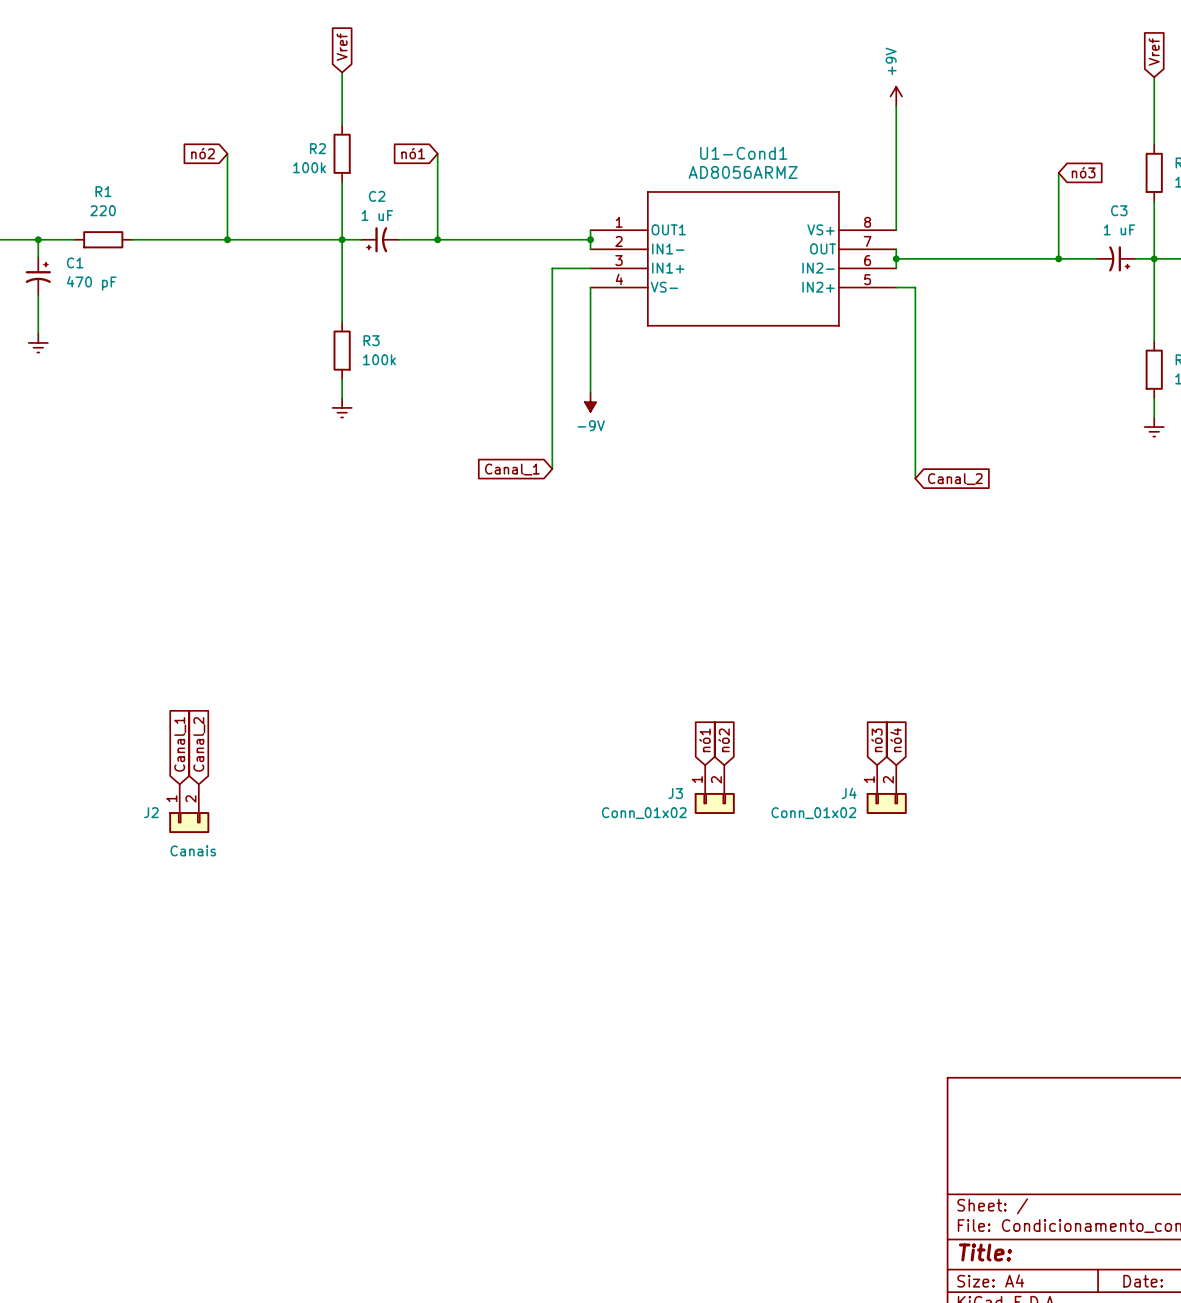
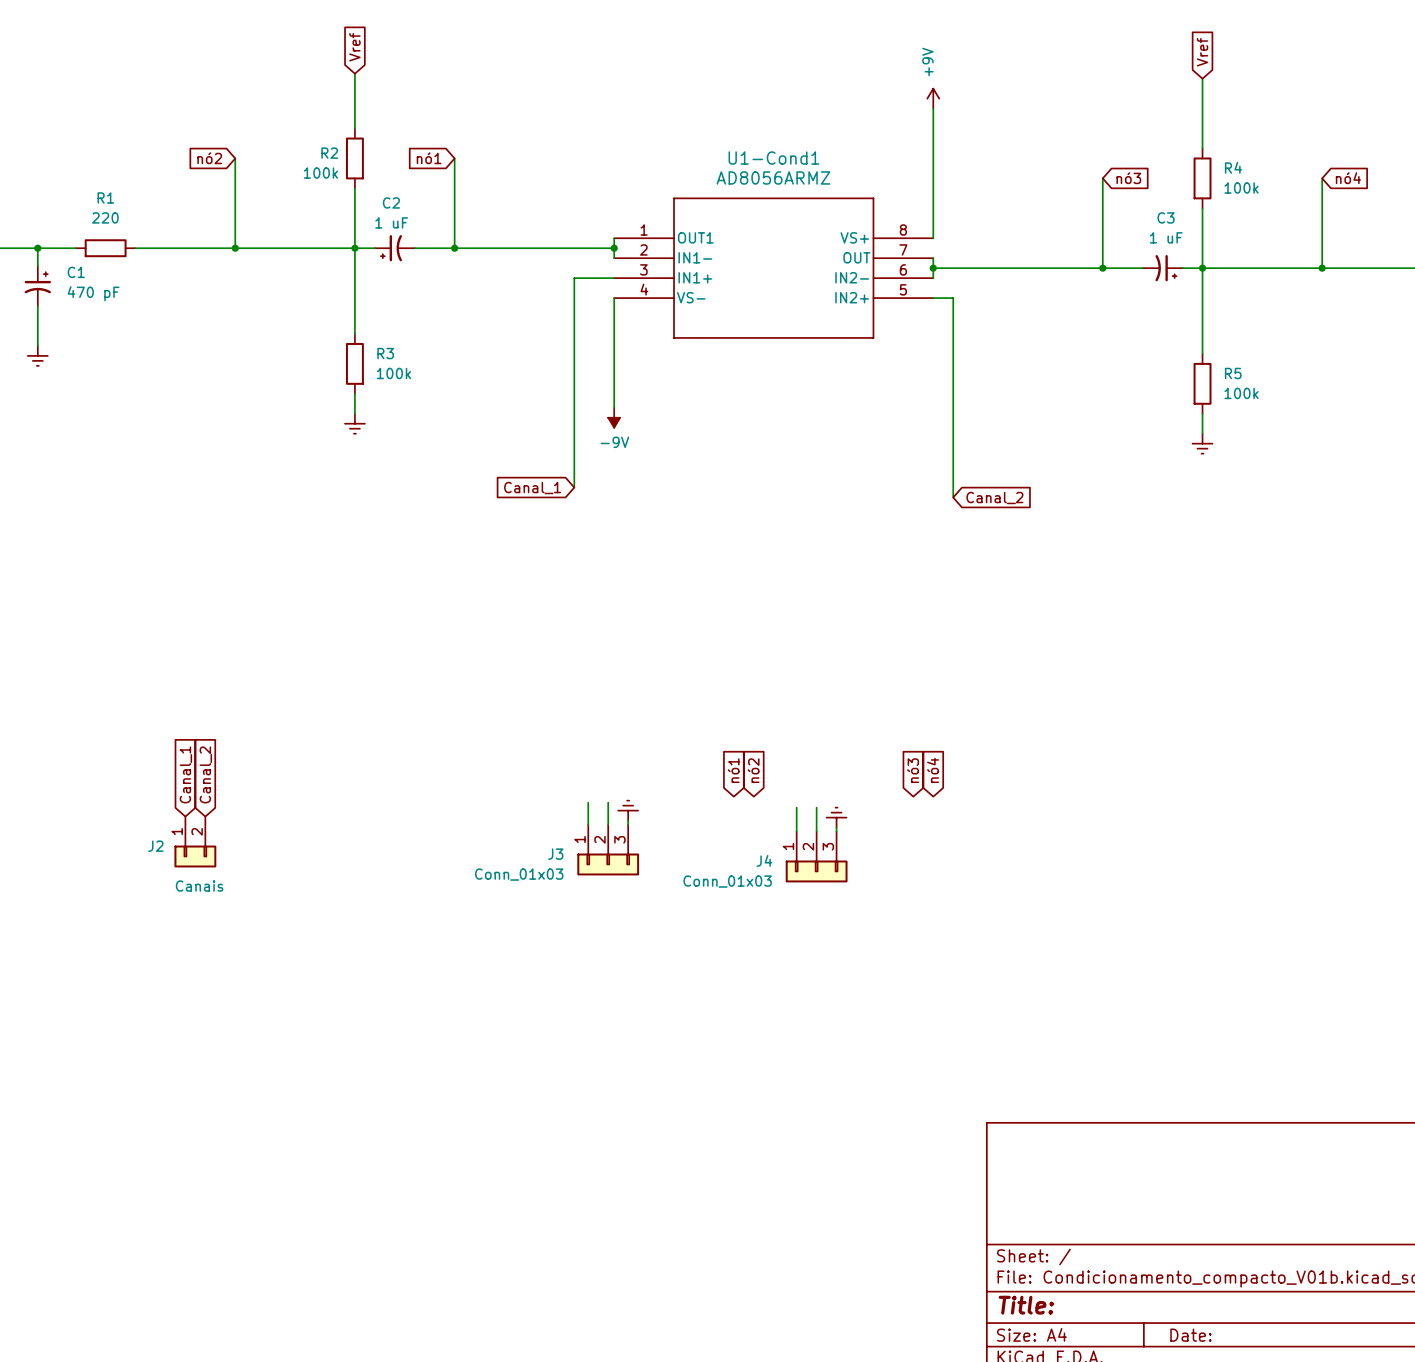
J3 symbol: [694, 765, 735, 814] -> [577, 824, 640, 876]
J4 symbol: [866, 765, 907, 814] -> [785, 831, 848, 883]
wire: none -> (588, 802) (588, 824)
wire: none -> (608, 802) (608, 824)
wire: none -> (796, 807) (796, 831)
wire: none -> (816, 807) (816, 831)
power symbol: none -> (628, 810)
power symbol: none -> (836, 817)
wire: none -> (628, 820) (628, 824)
J3 name position: J3 (675, 793) -> J3 (555, 854)
wire: none -> (836, 827) (836, 831)
J3 value: Conn_01x02 (644, 813) -> Conn_01x03 (519, 874)
J4 value: Conn_01x02 (813, 813) -> Conn_01x03 (727, 881)

